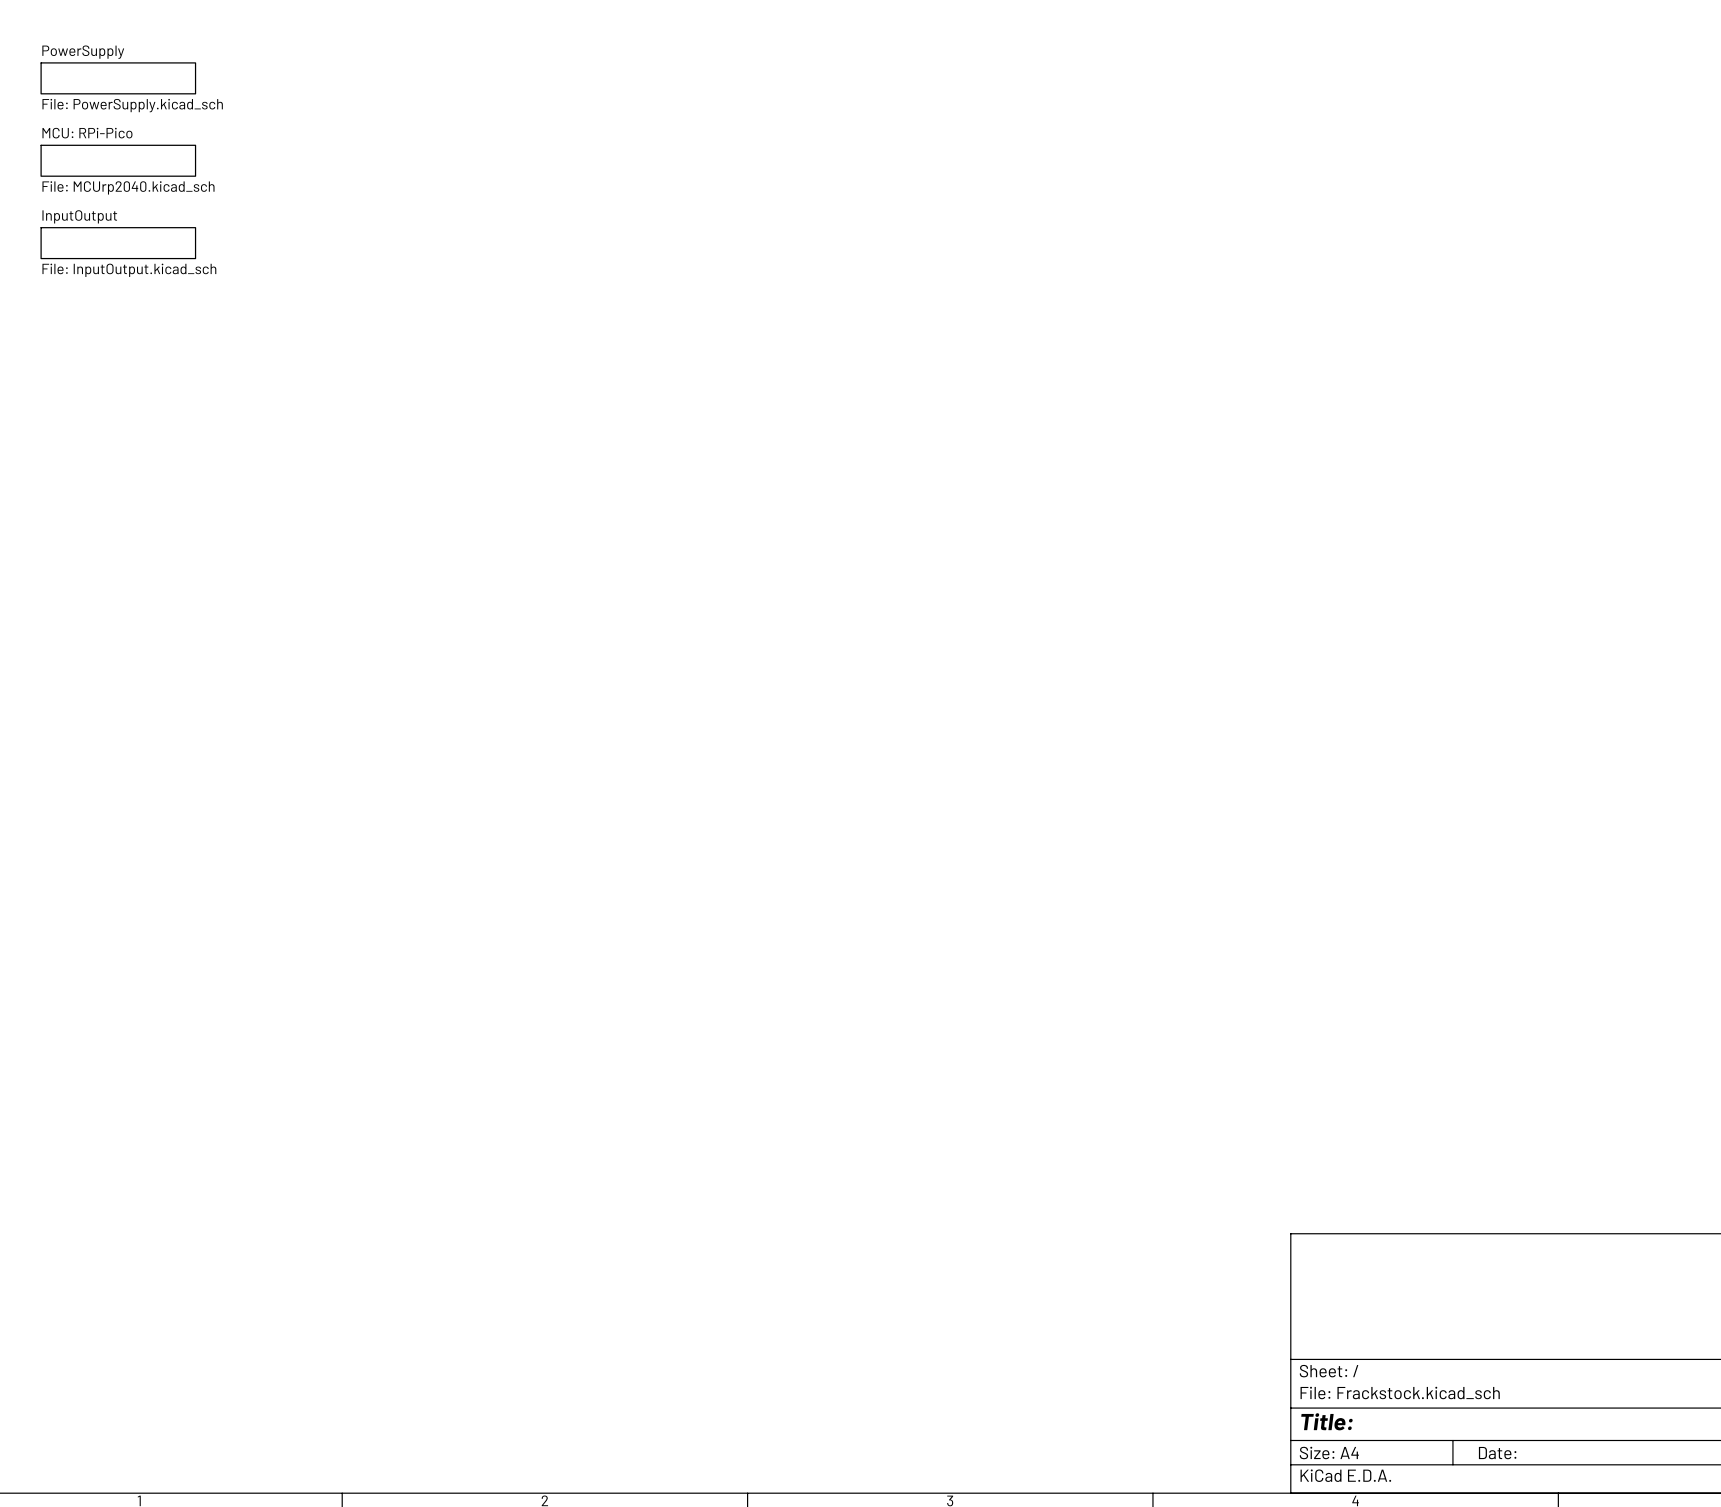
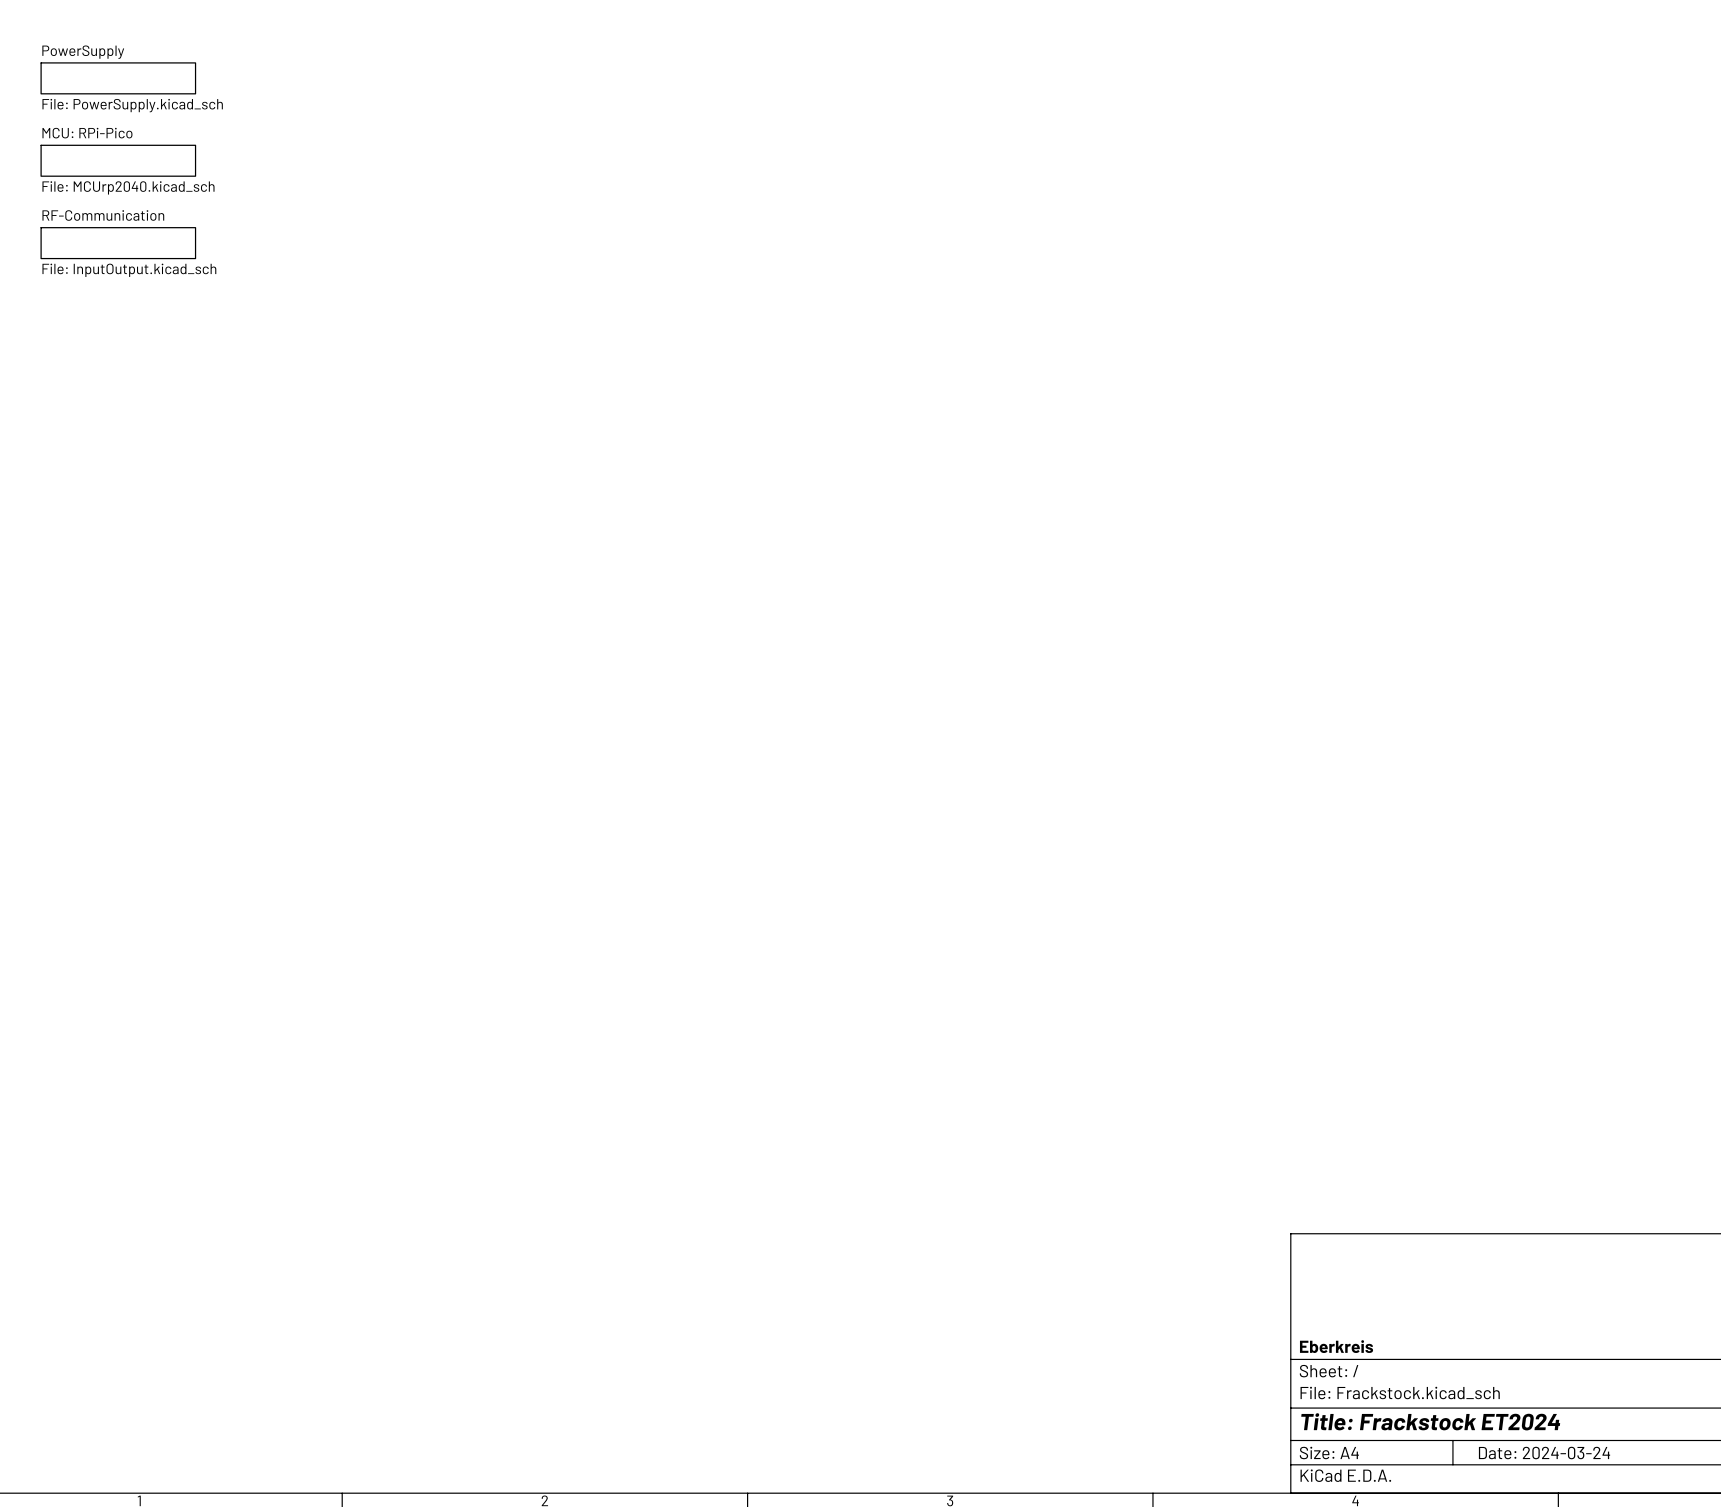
sheet InputOutput name: InputOutput (79, 216) -> RF-Communication (103, 215)
title block: none -> Eberkreis (1336, 1346)
title block: Title: (1327, 1421) -> Title: Frackstock ET2024 (1430, 1421)
title block: Date: (1497, 1453) -> Date: 2024-03-24 (1544, 1453)

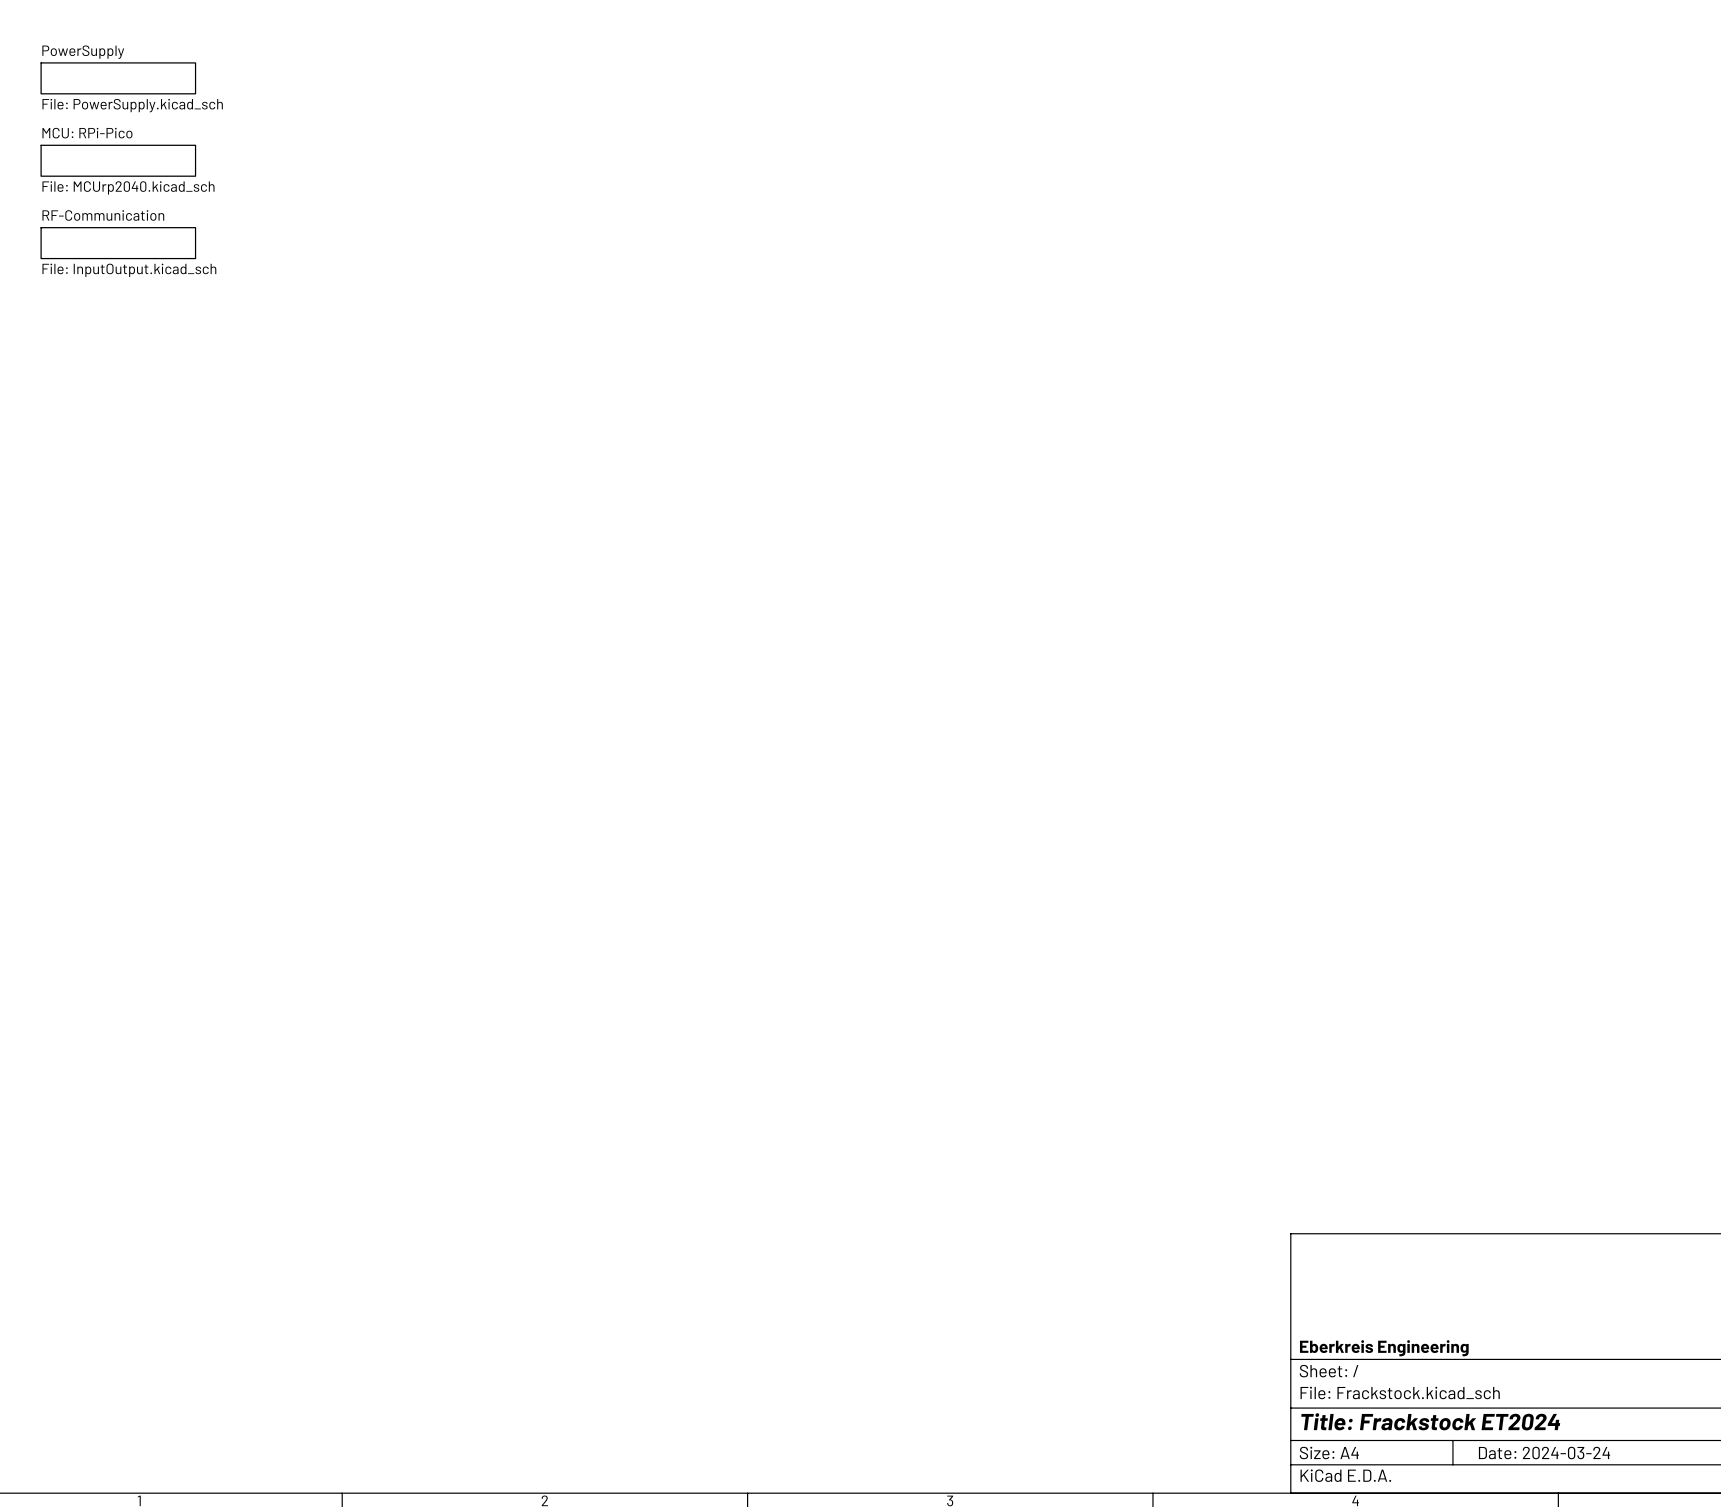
title block: Eberkreis (1336, 1346) -> Eberkreis Engineering (1384, 1348)

